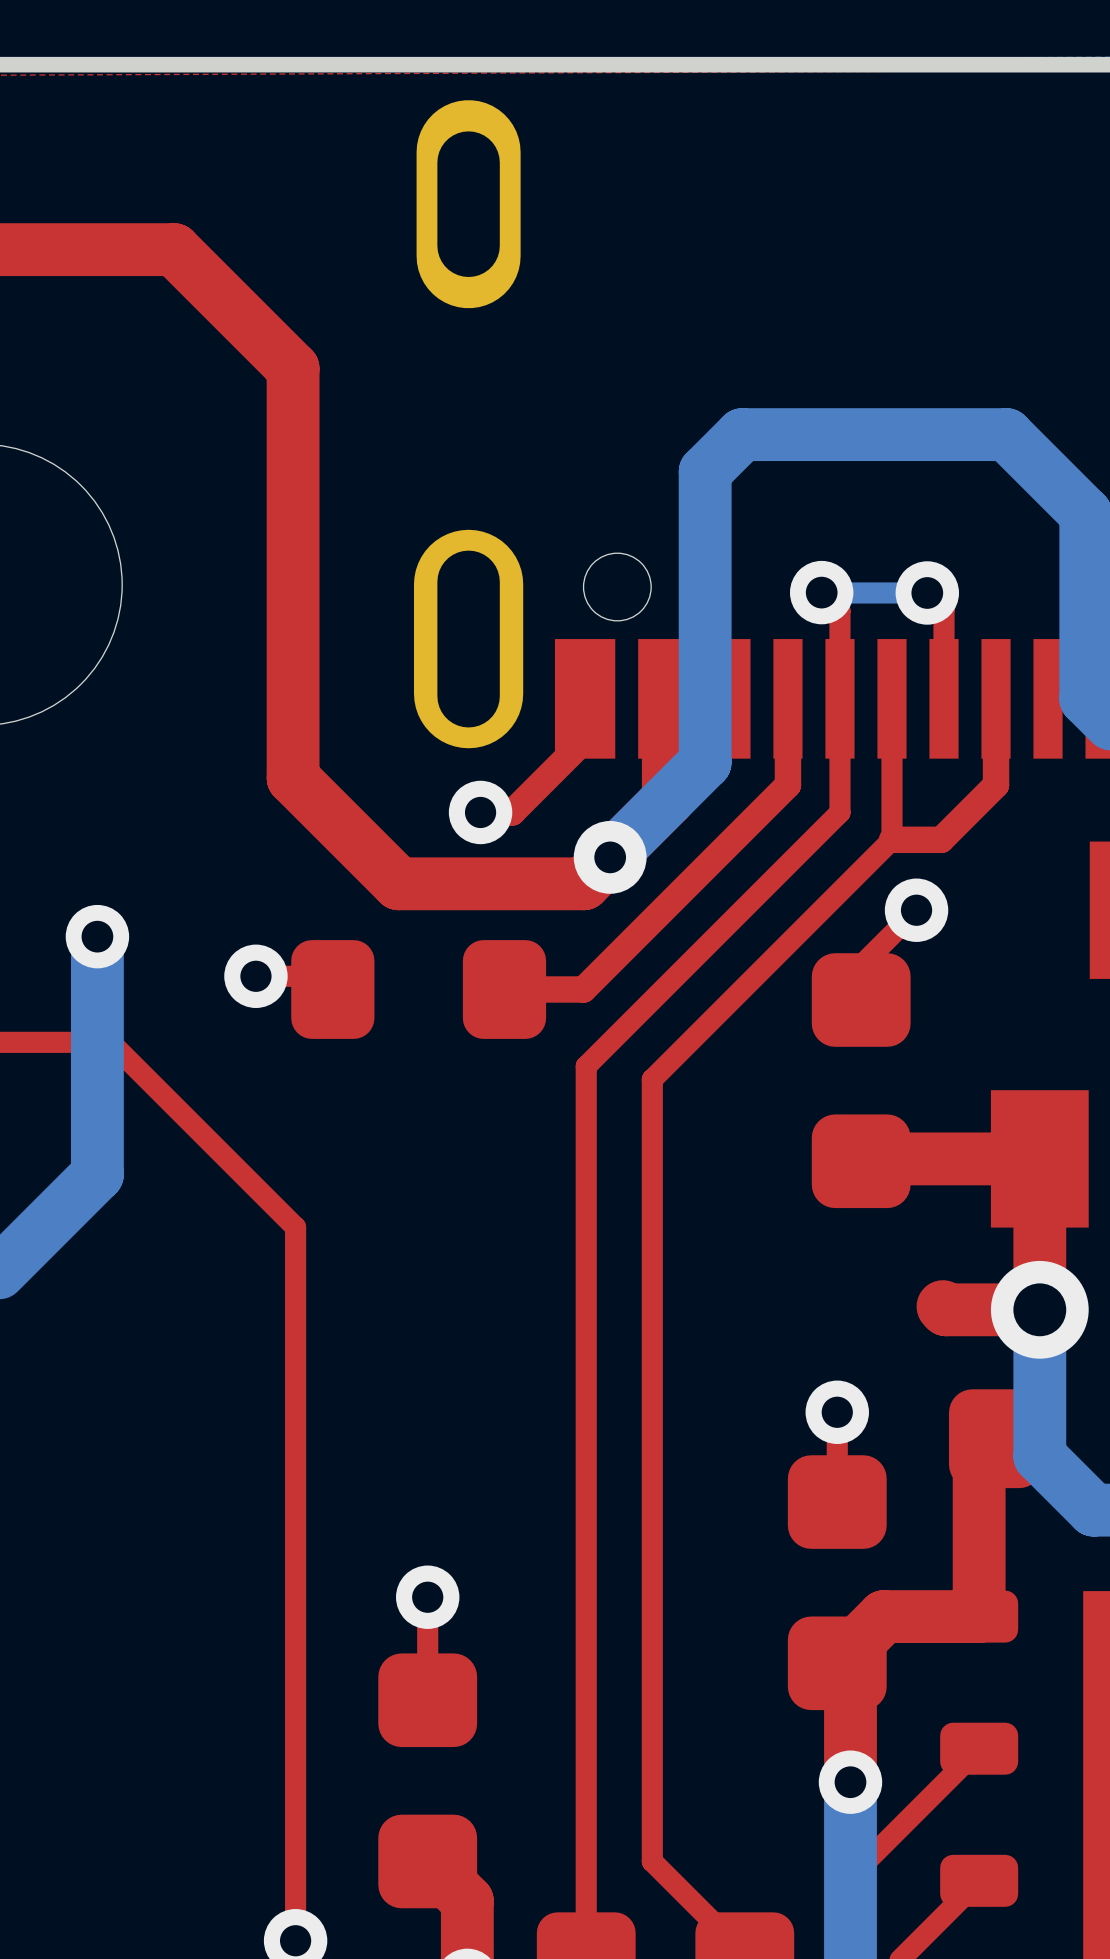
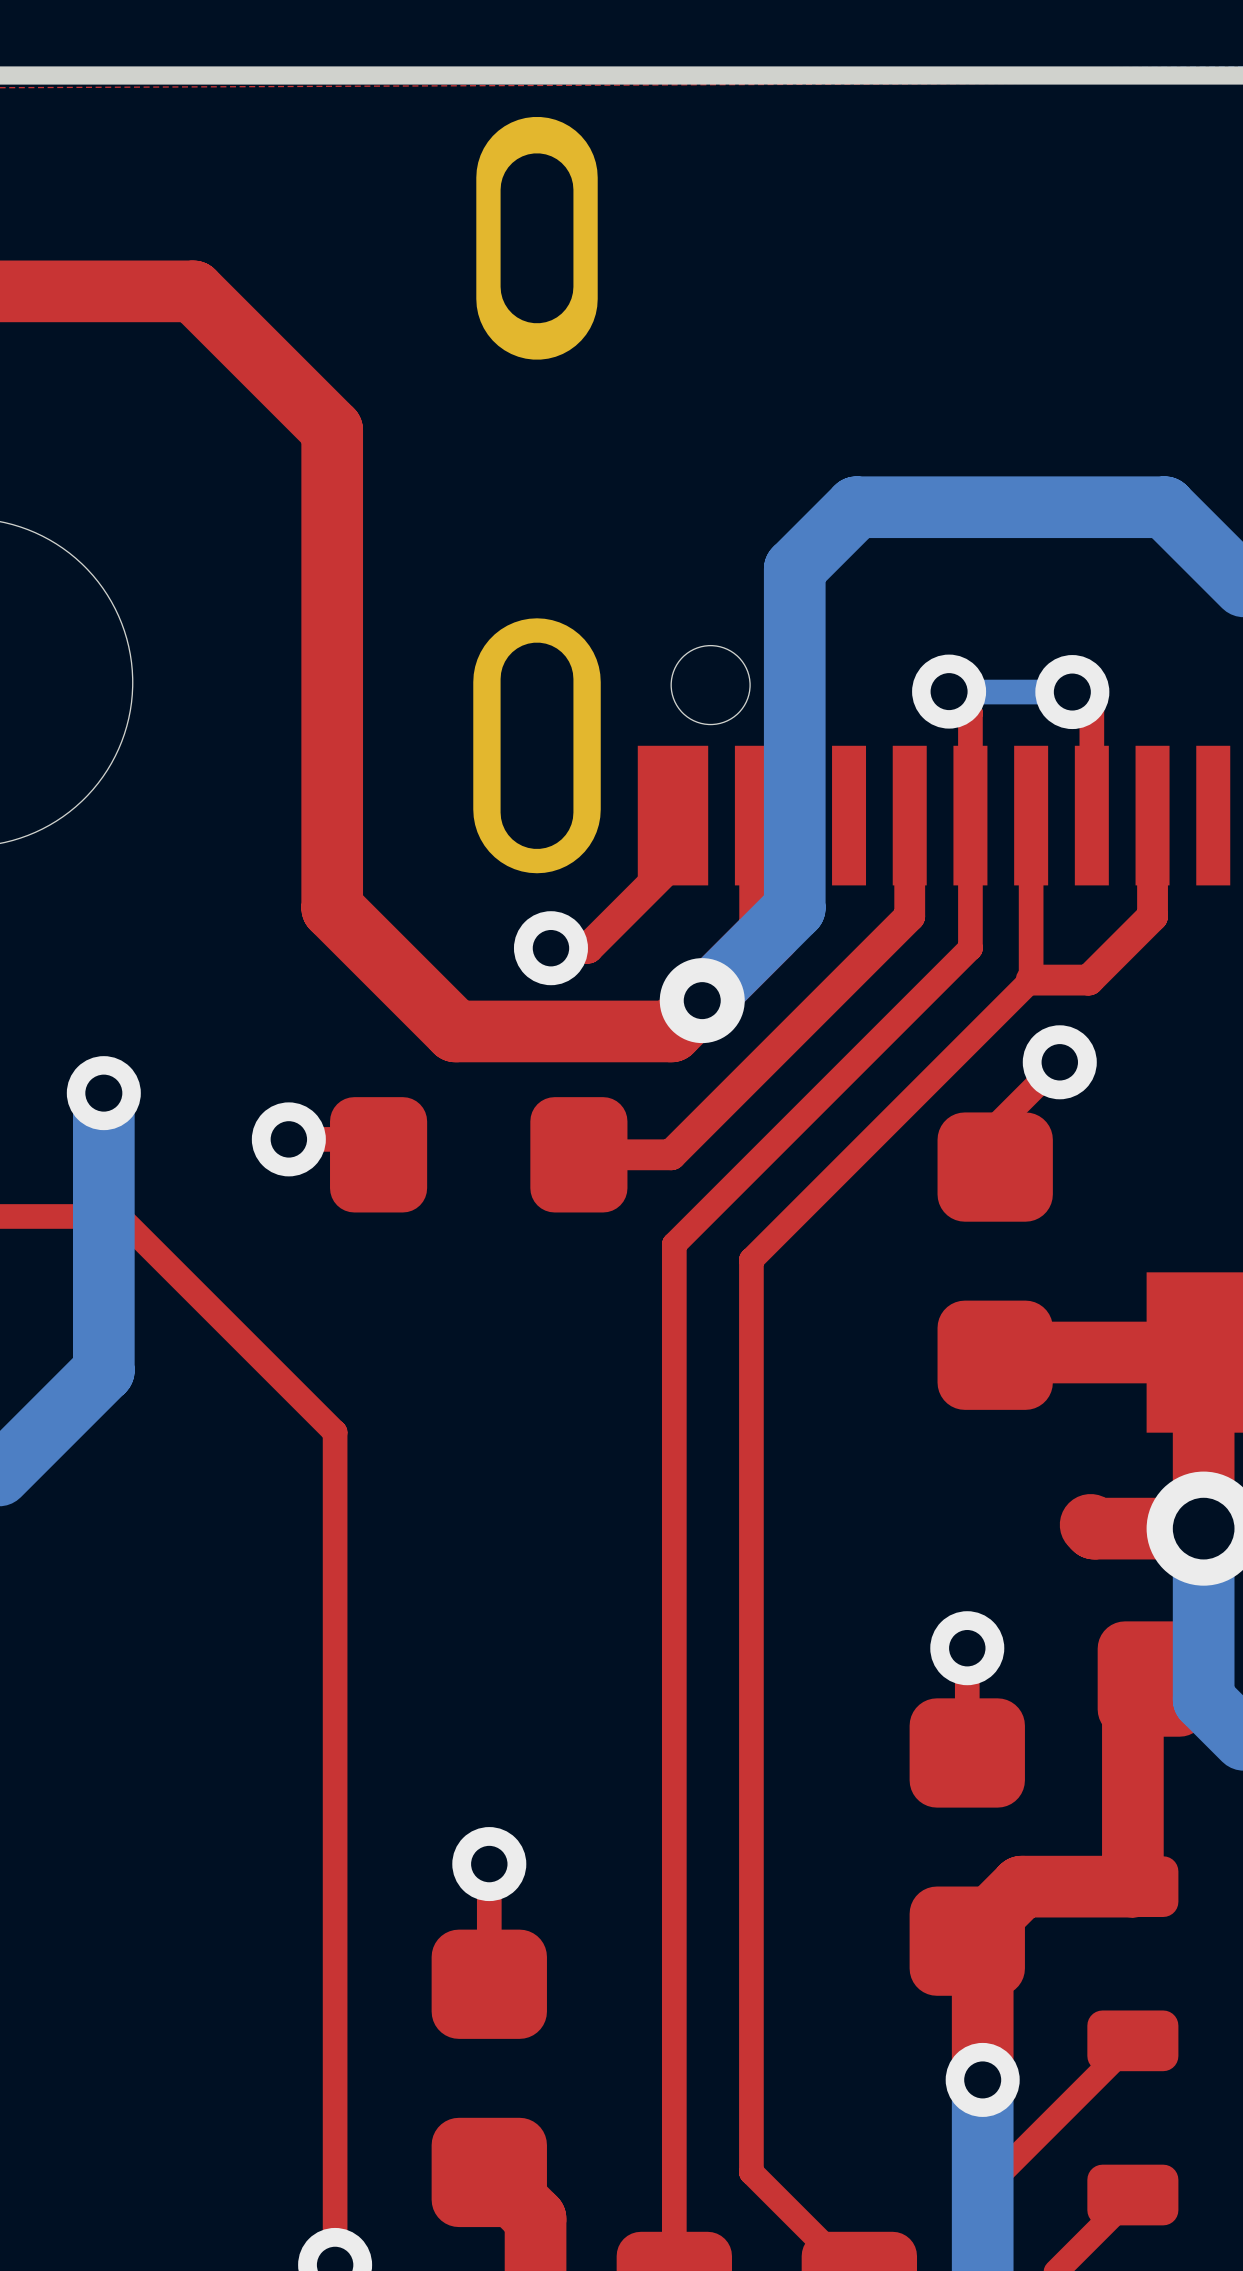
bottom track: (705, 471) (705, 762) (689, 778) -> (813, 550) (794, 568) (794, 908)

